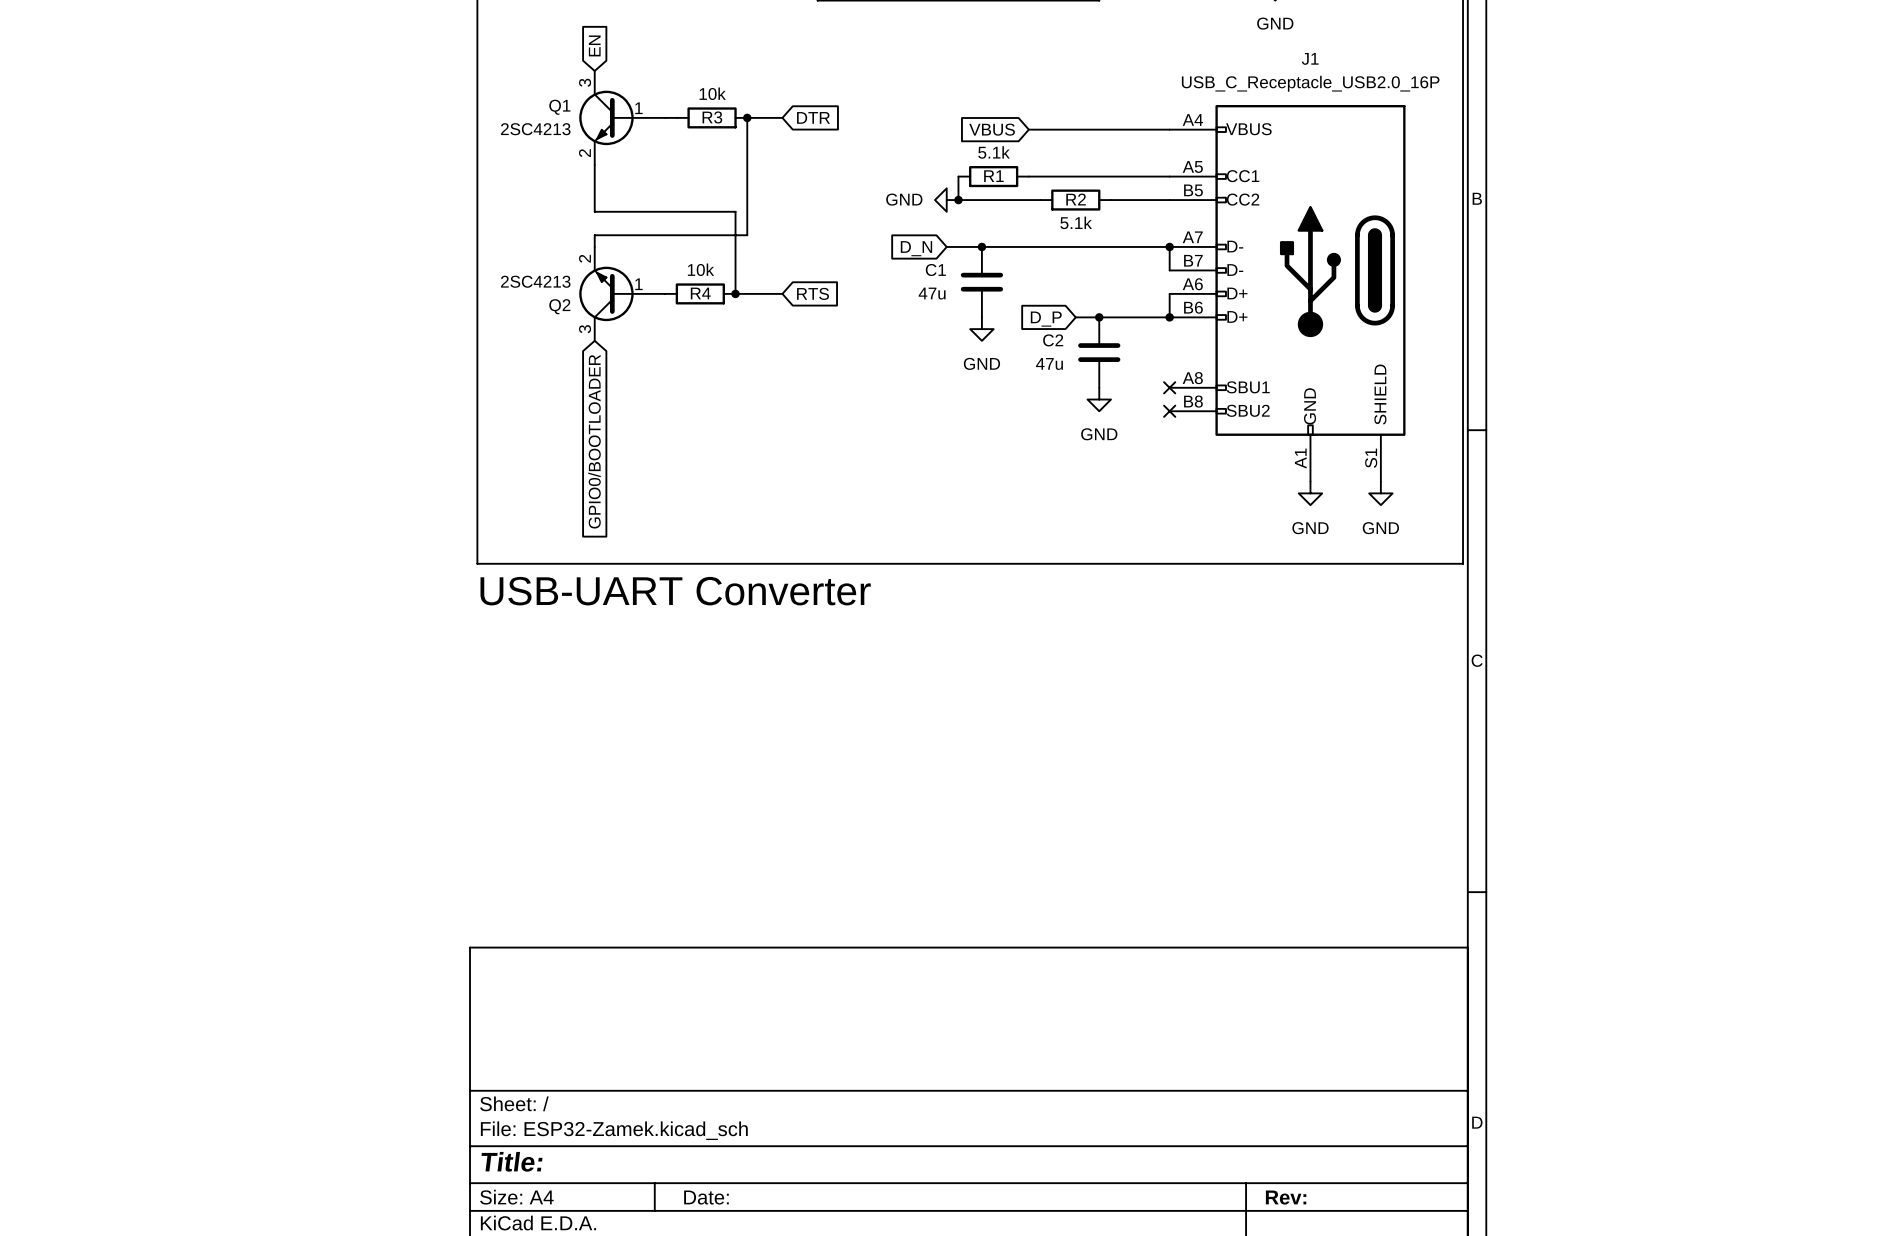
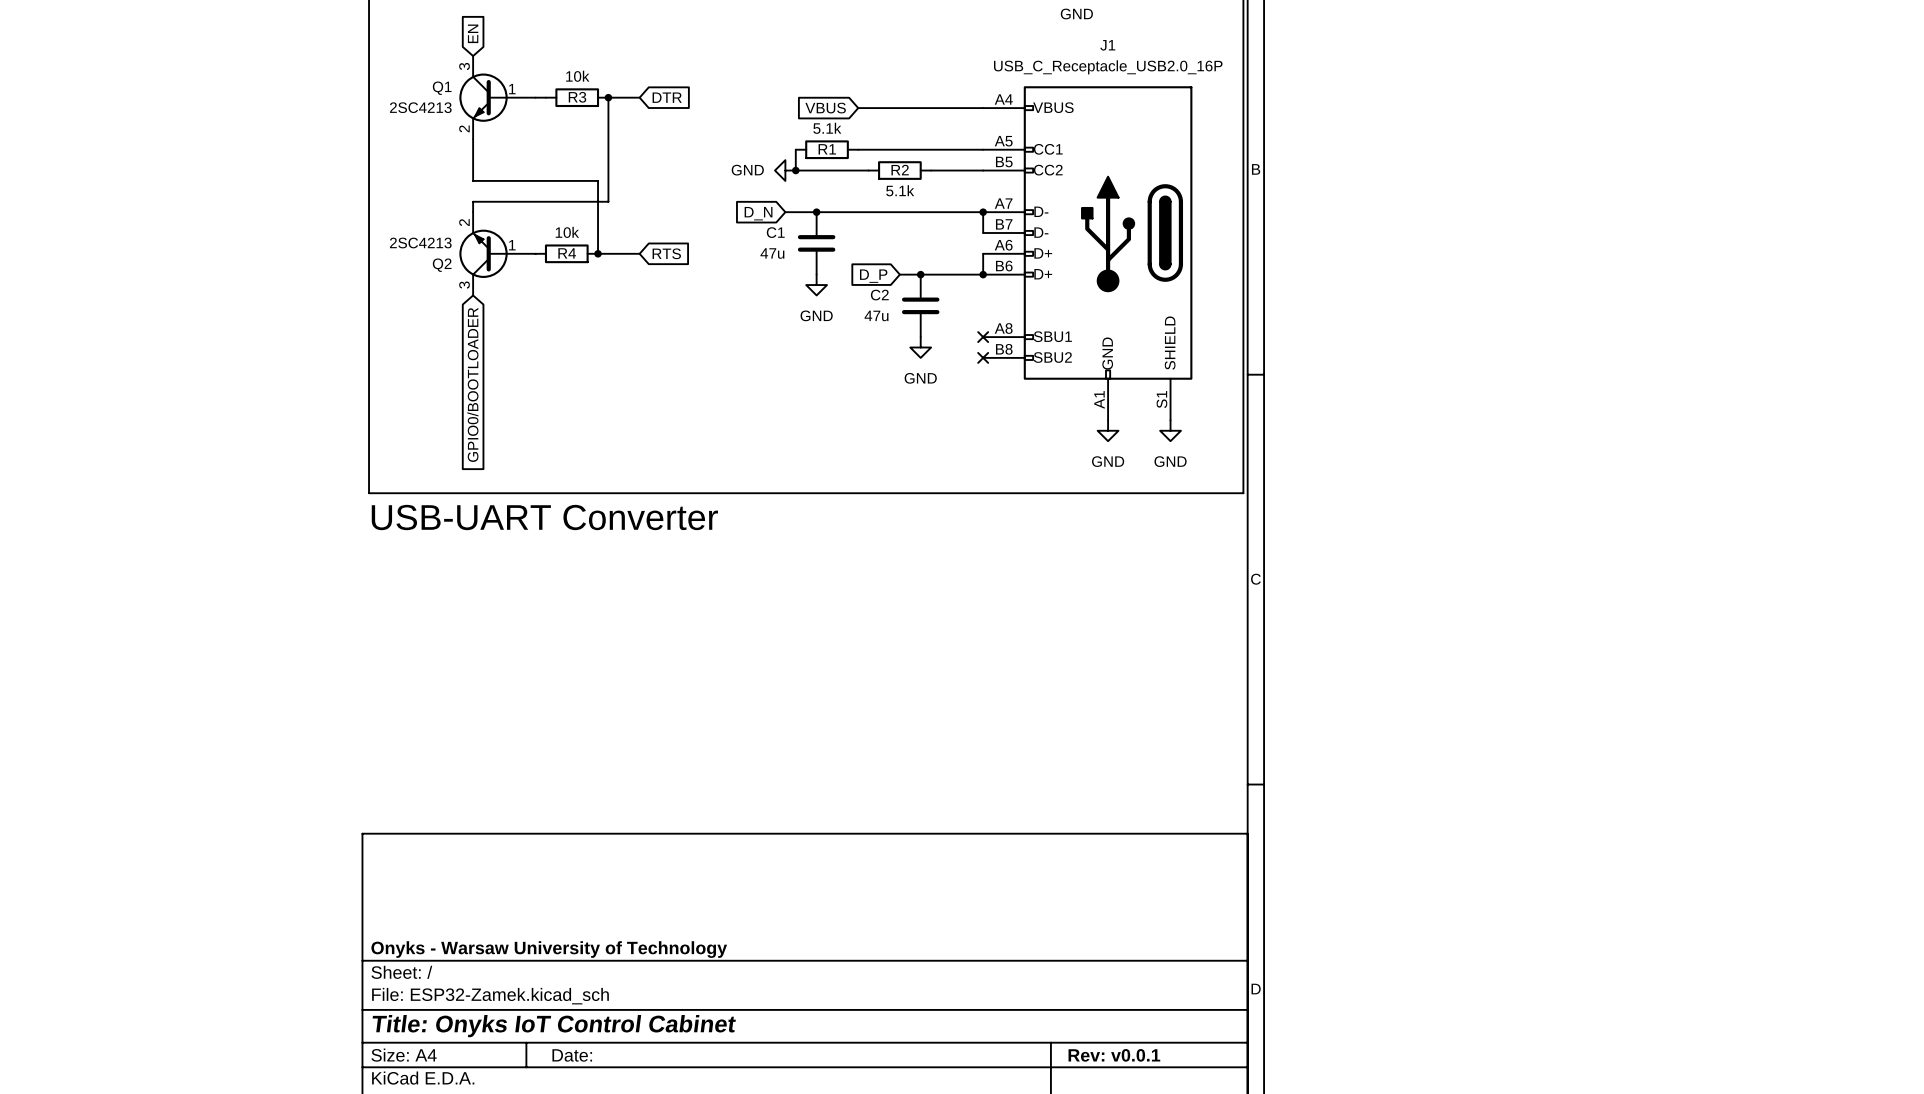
title block: none -> Onyks - Warsaw University of Technology (549, 949)
title block: Title: (511, 1161) -> Title: Onyks IoT Control Cabinet (554, 1026)
title block: Rev: (1286, 1197) -> Rev: v0.0.1 (1114, 1055)

